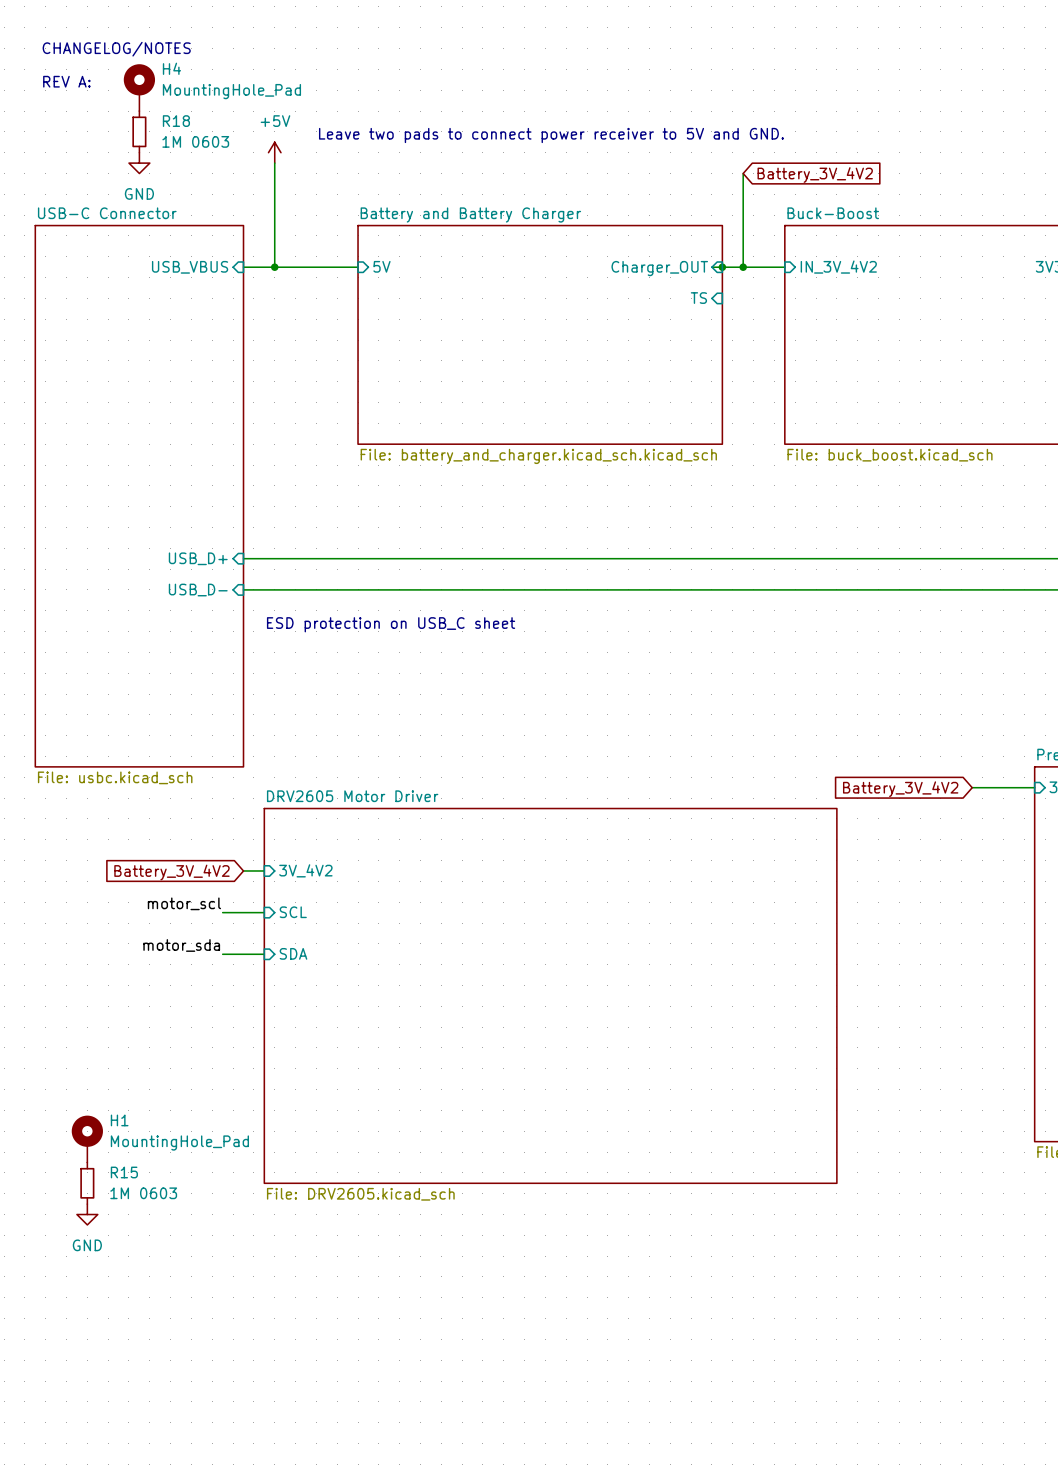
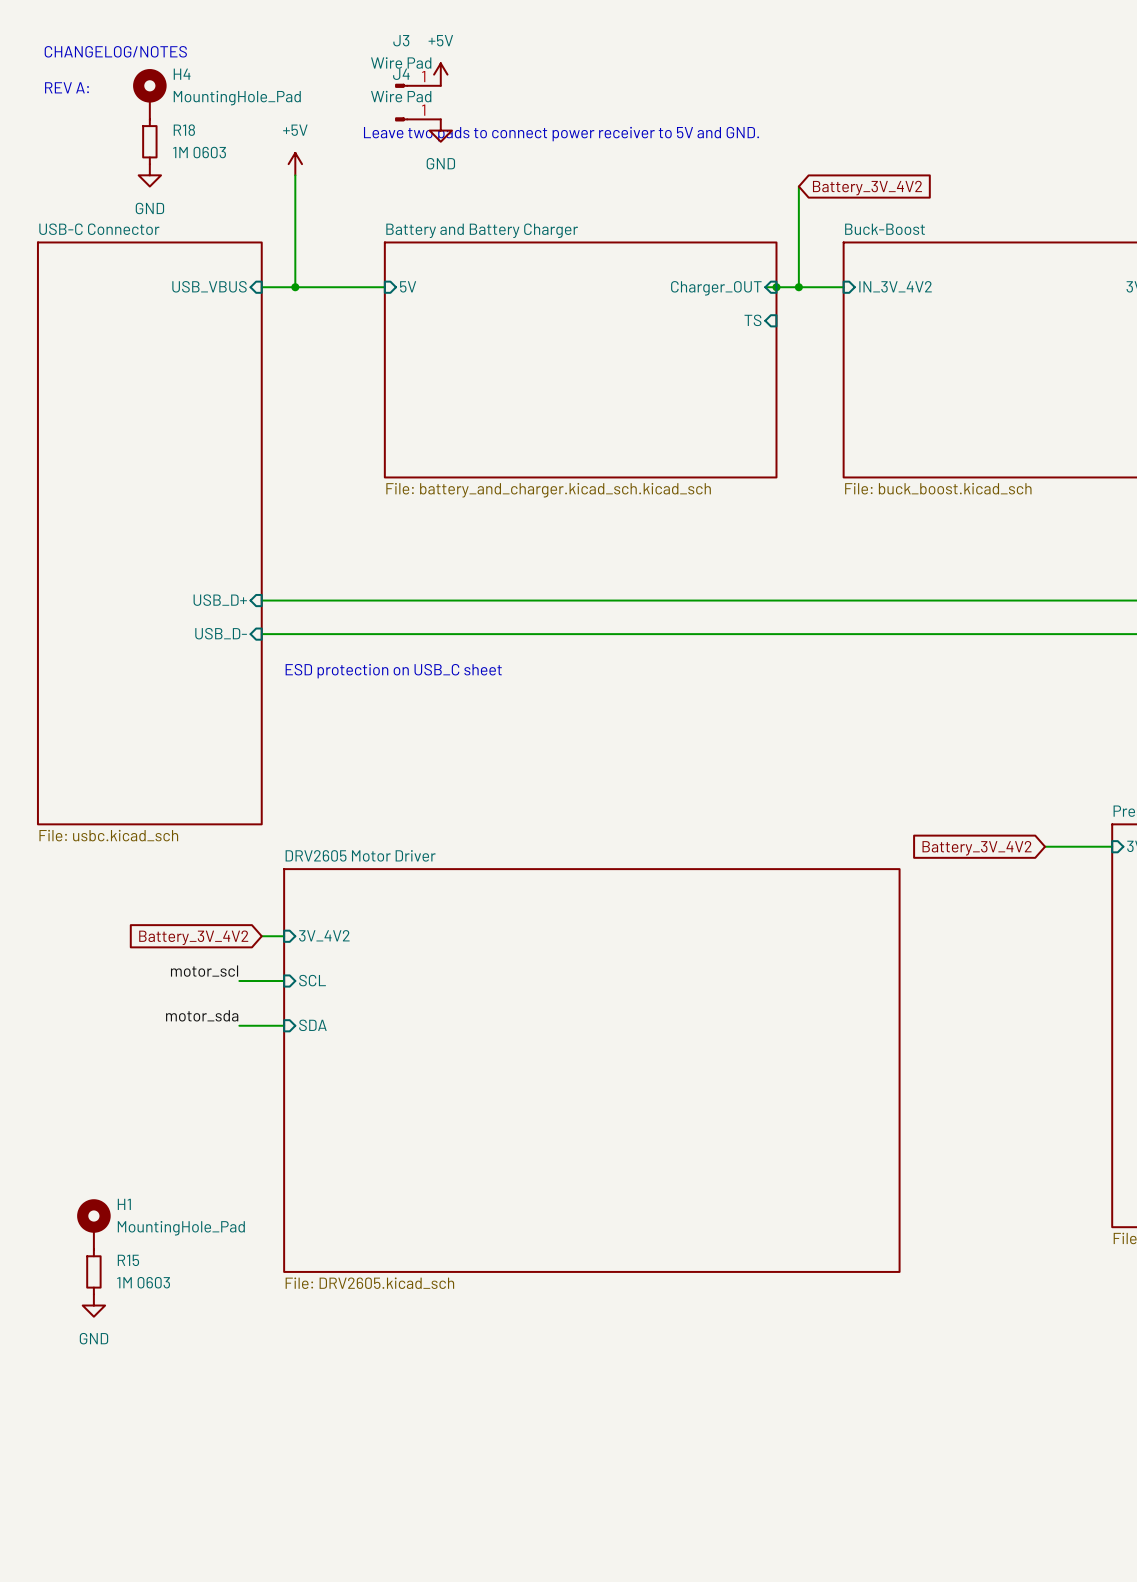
power symbol: none -> +5V (440, 74)
J3: none -> Wire Pad (418, 85)
J4: none -> Wire Pad (418, 119)
power symbol: none -> GND (440, 130)
text position: Leave two pads to connect power receiver to 5V and GND. (551, 135) -> Leave two pads to connect power receiver to 5V and GND. (561, 134)

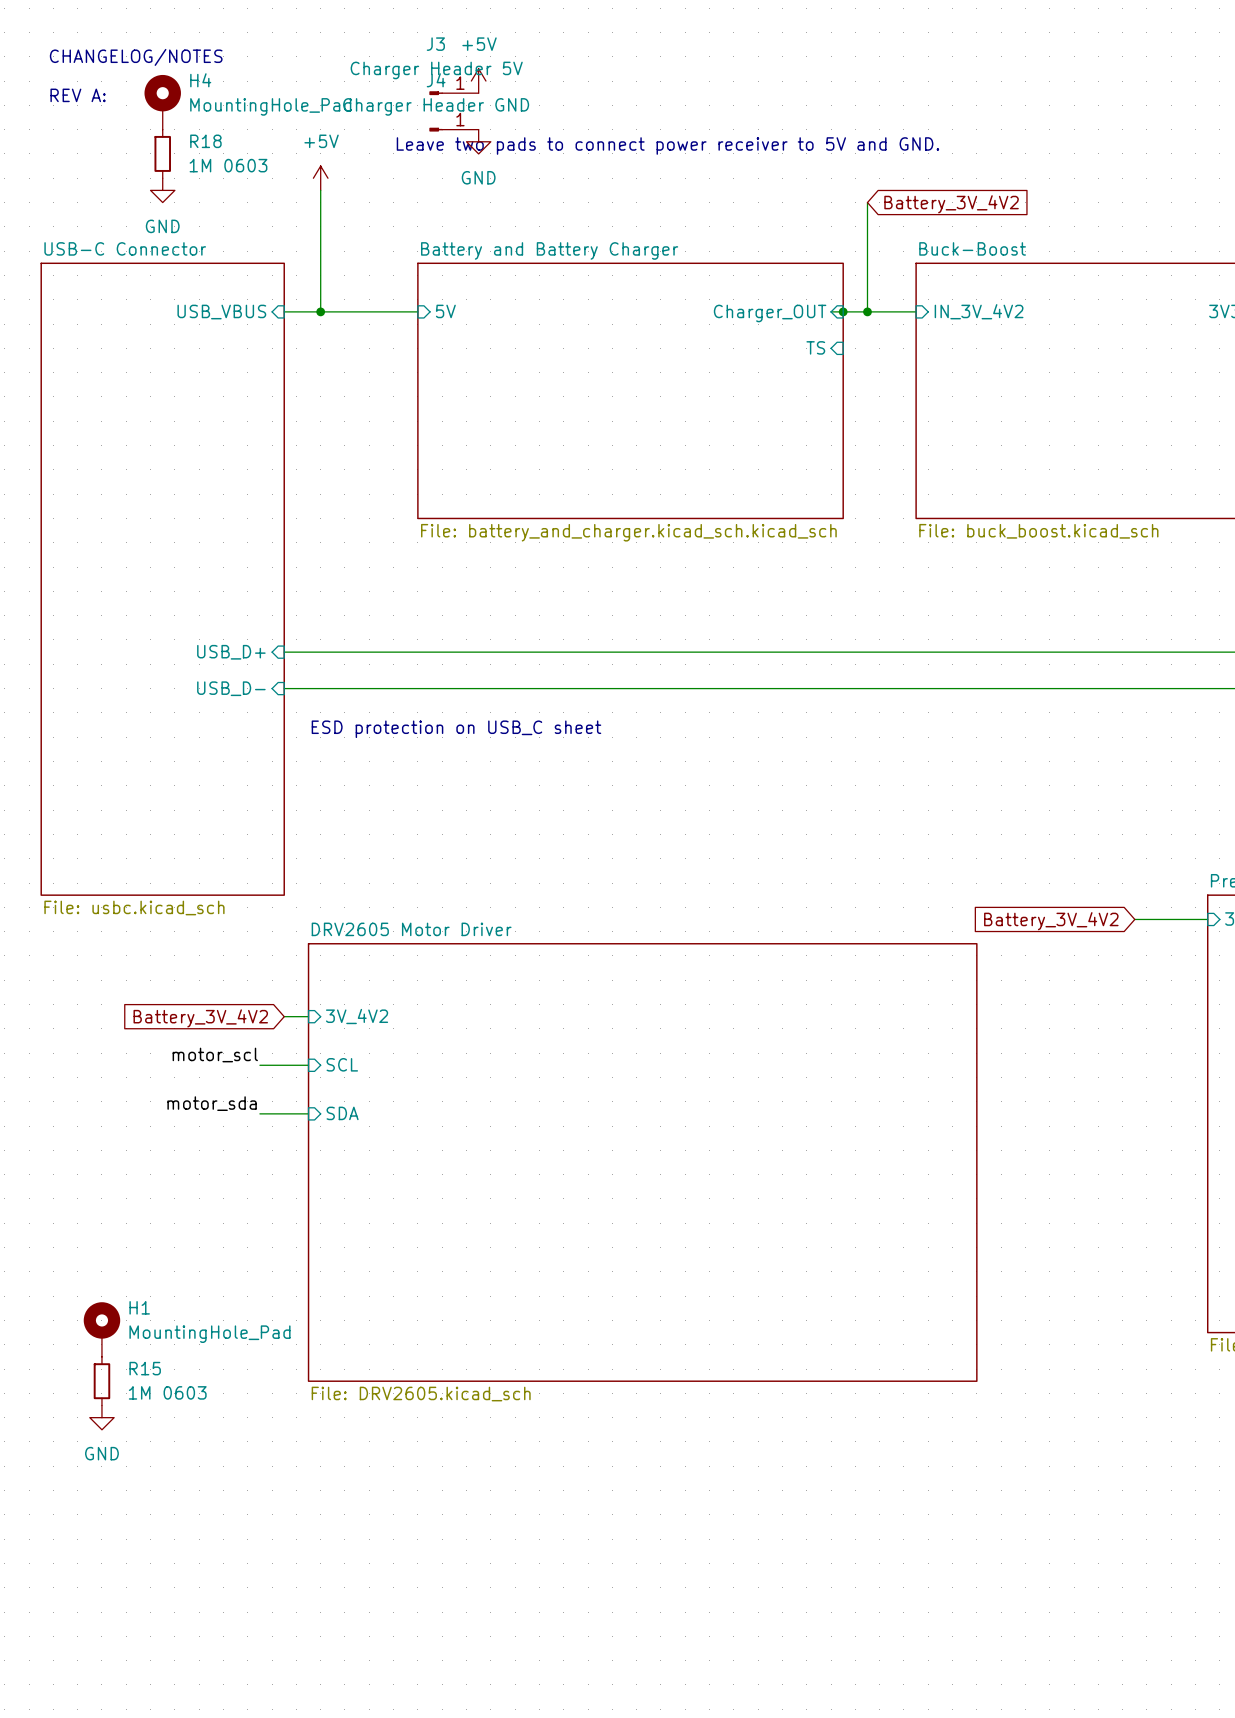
J3 value: Wire Pad (401, 63) -> Charger Header 5V (436, 70)
J4 value: Wire Pad (401, 96) -> Charger Header GND (436, 106)

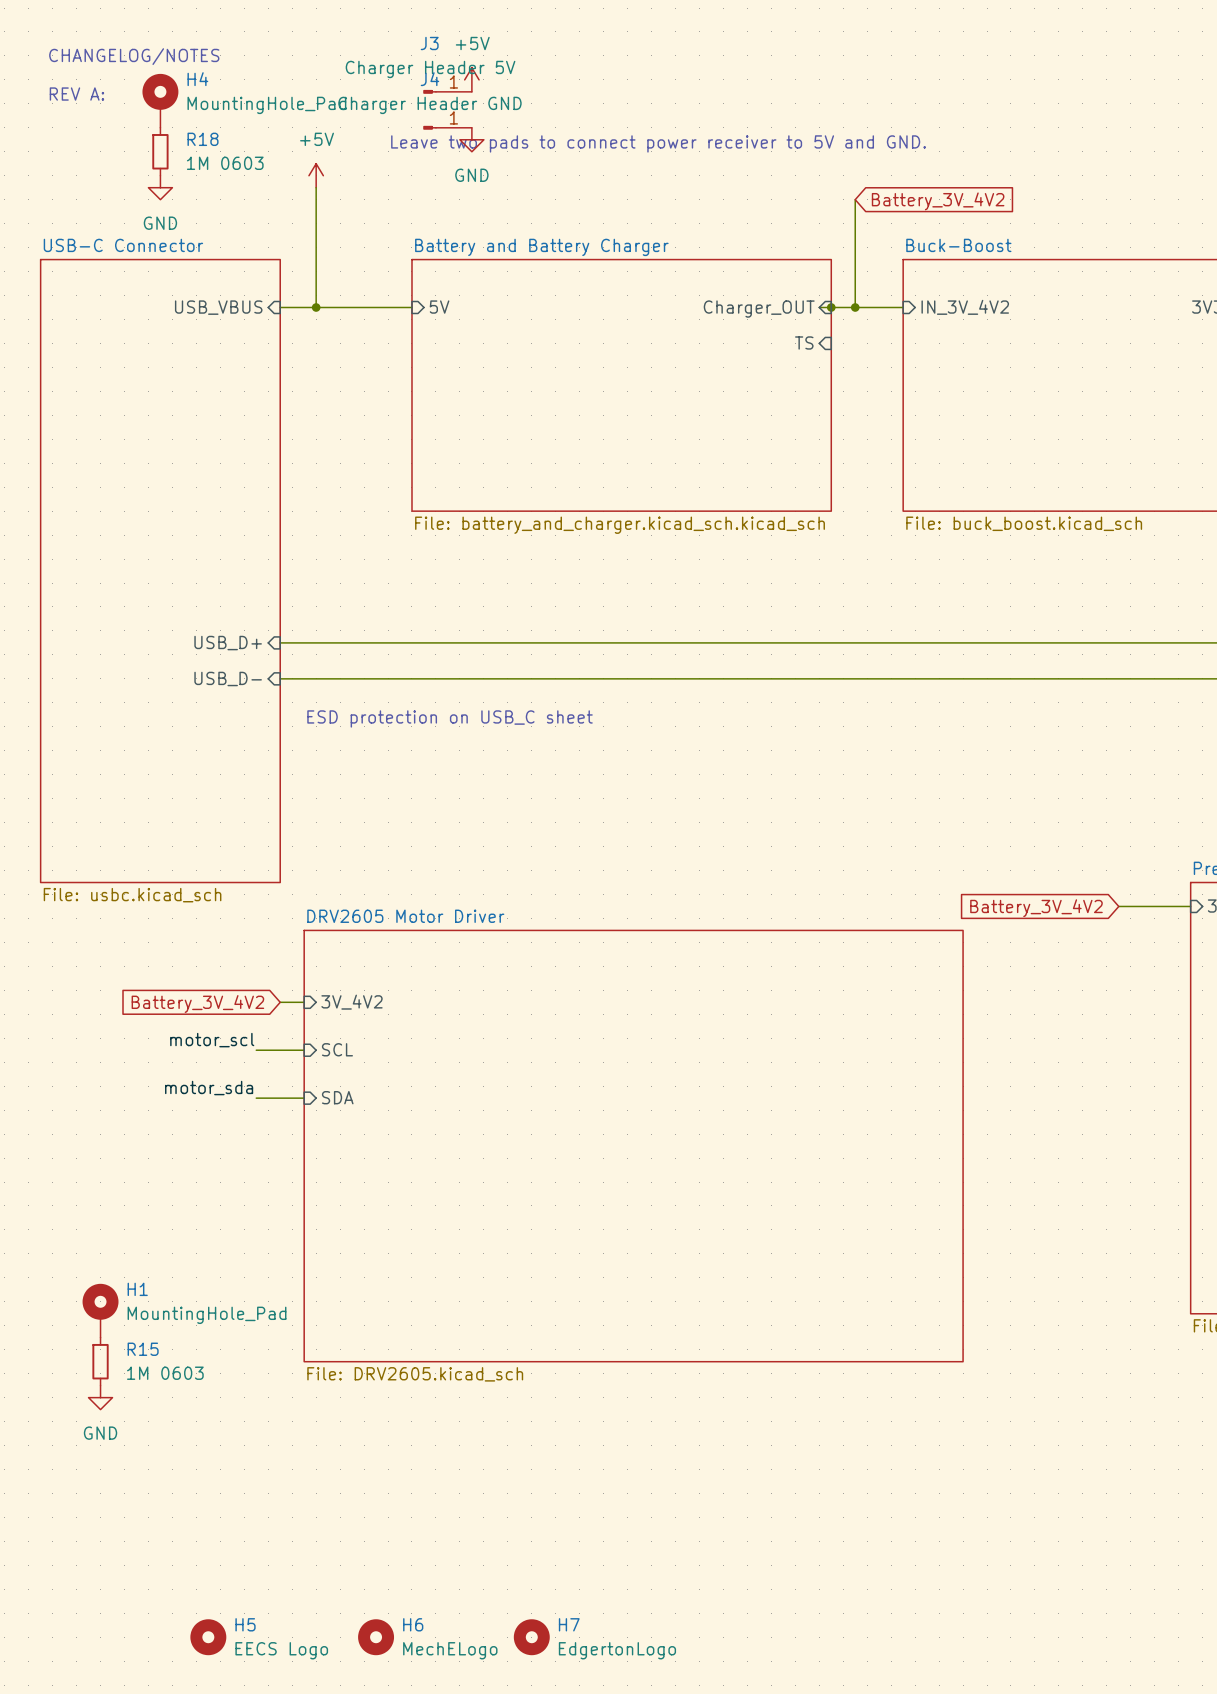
H5: none -> EECS Logo (208, 1637)
H6: none -> MechELogo (376, 1637)
H7: none -> EdgertonLogo (531, 1637)

